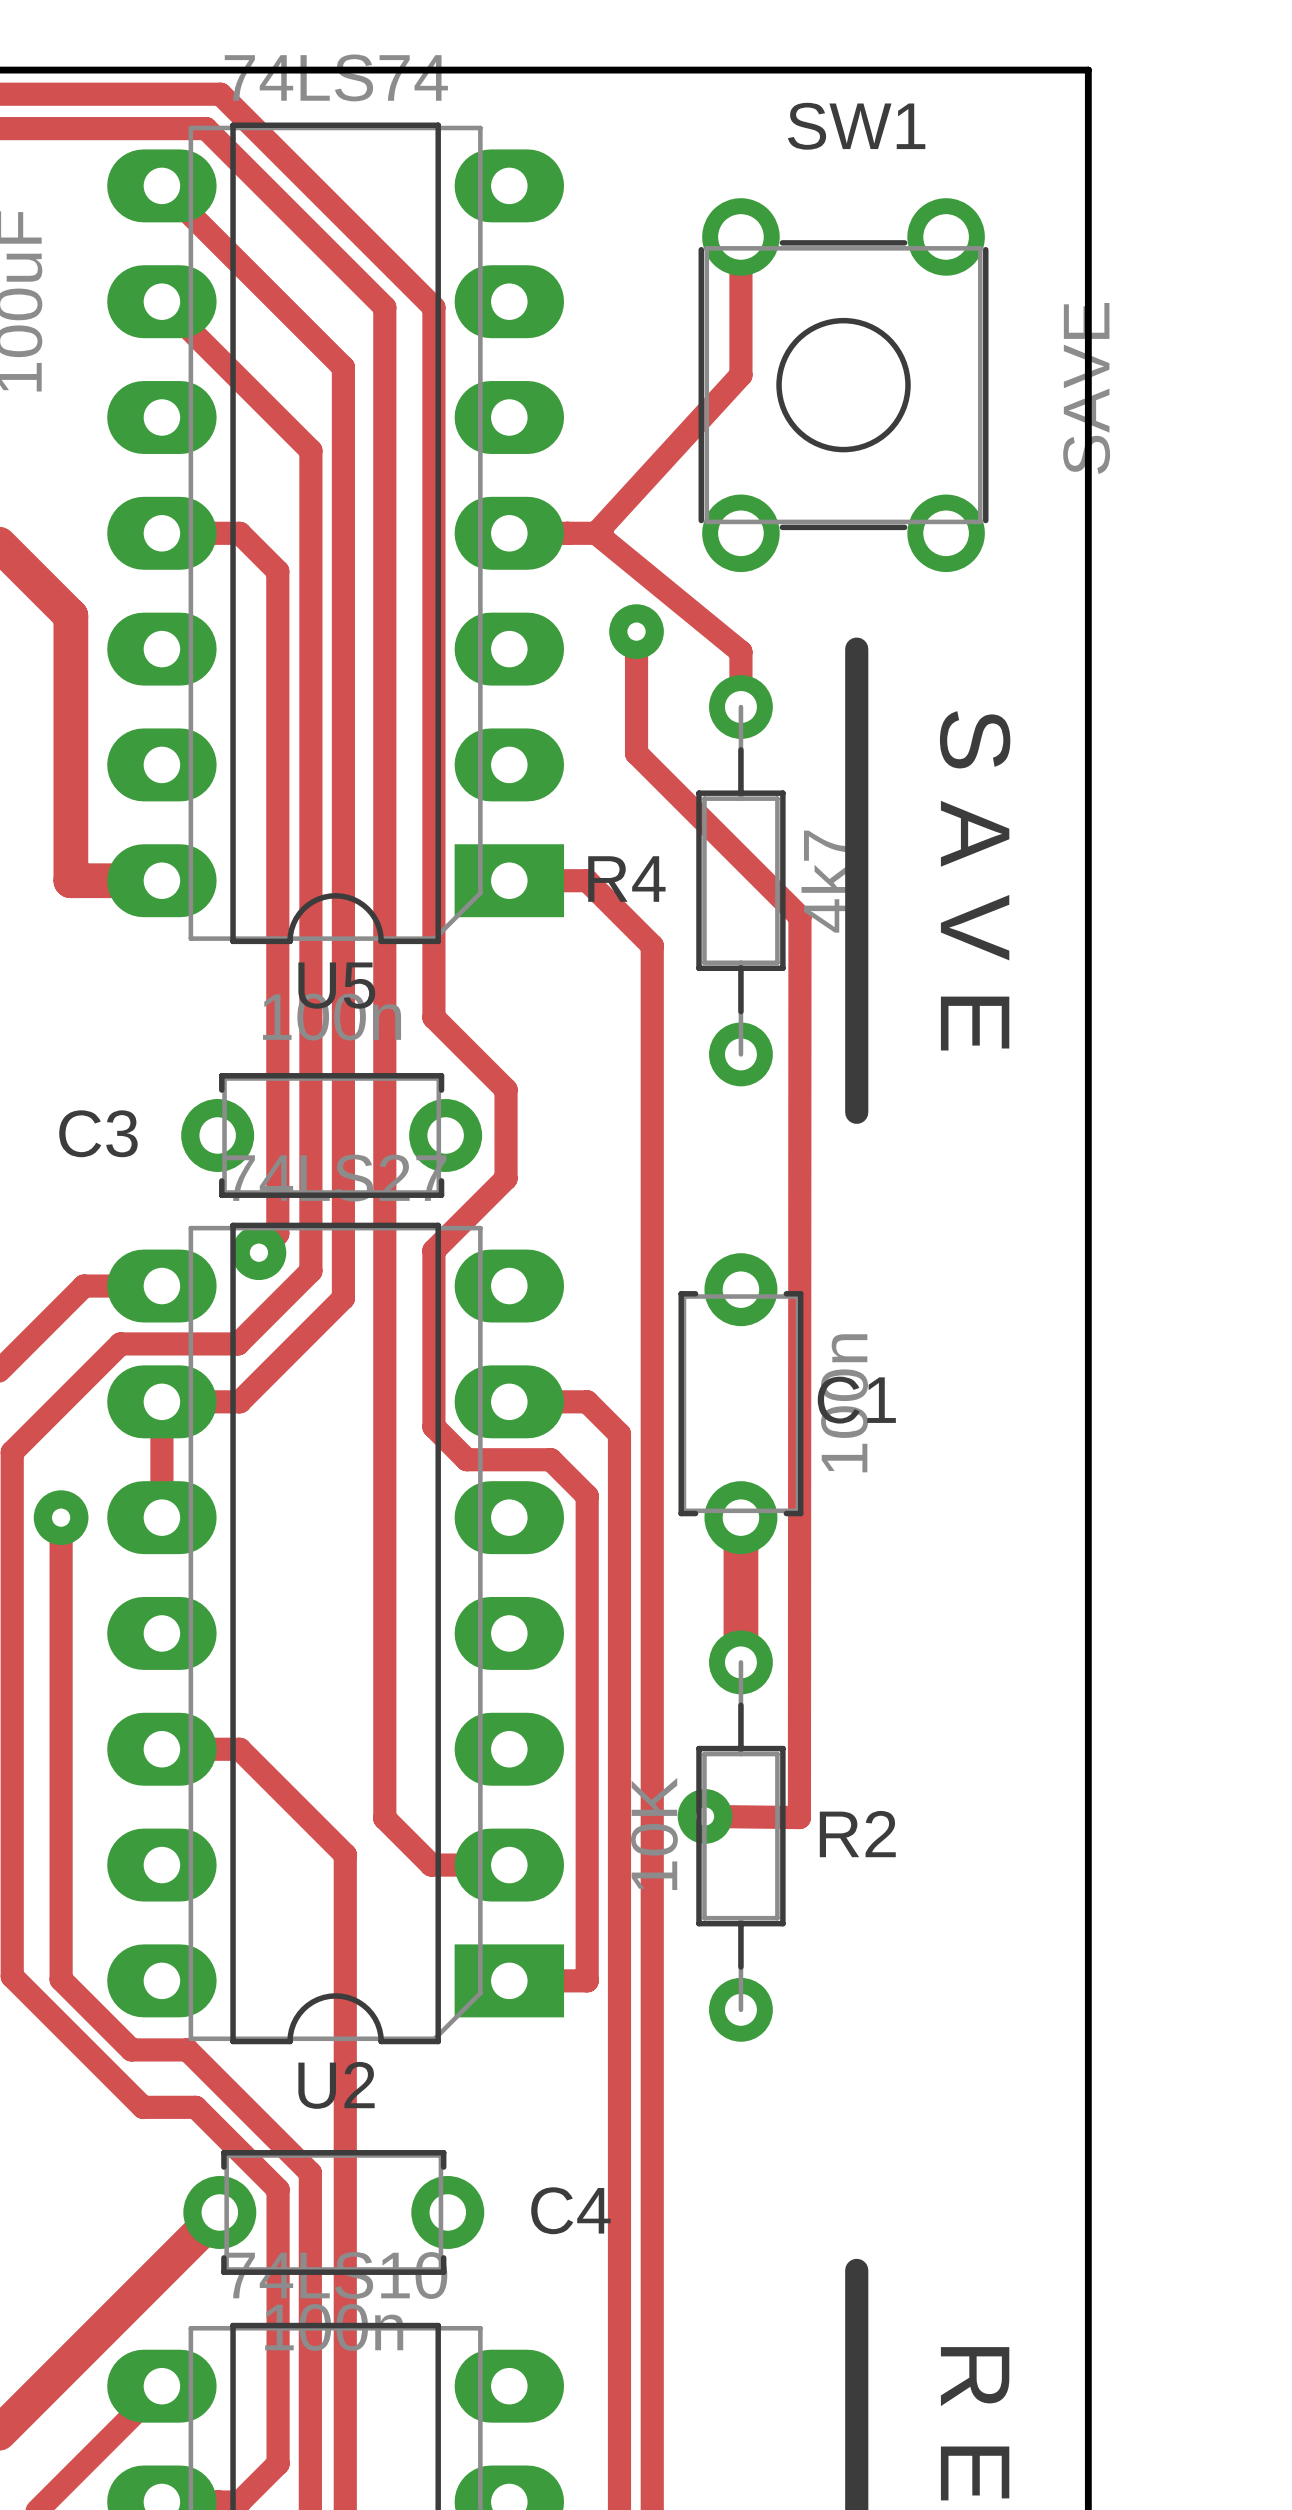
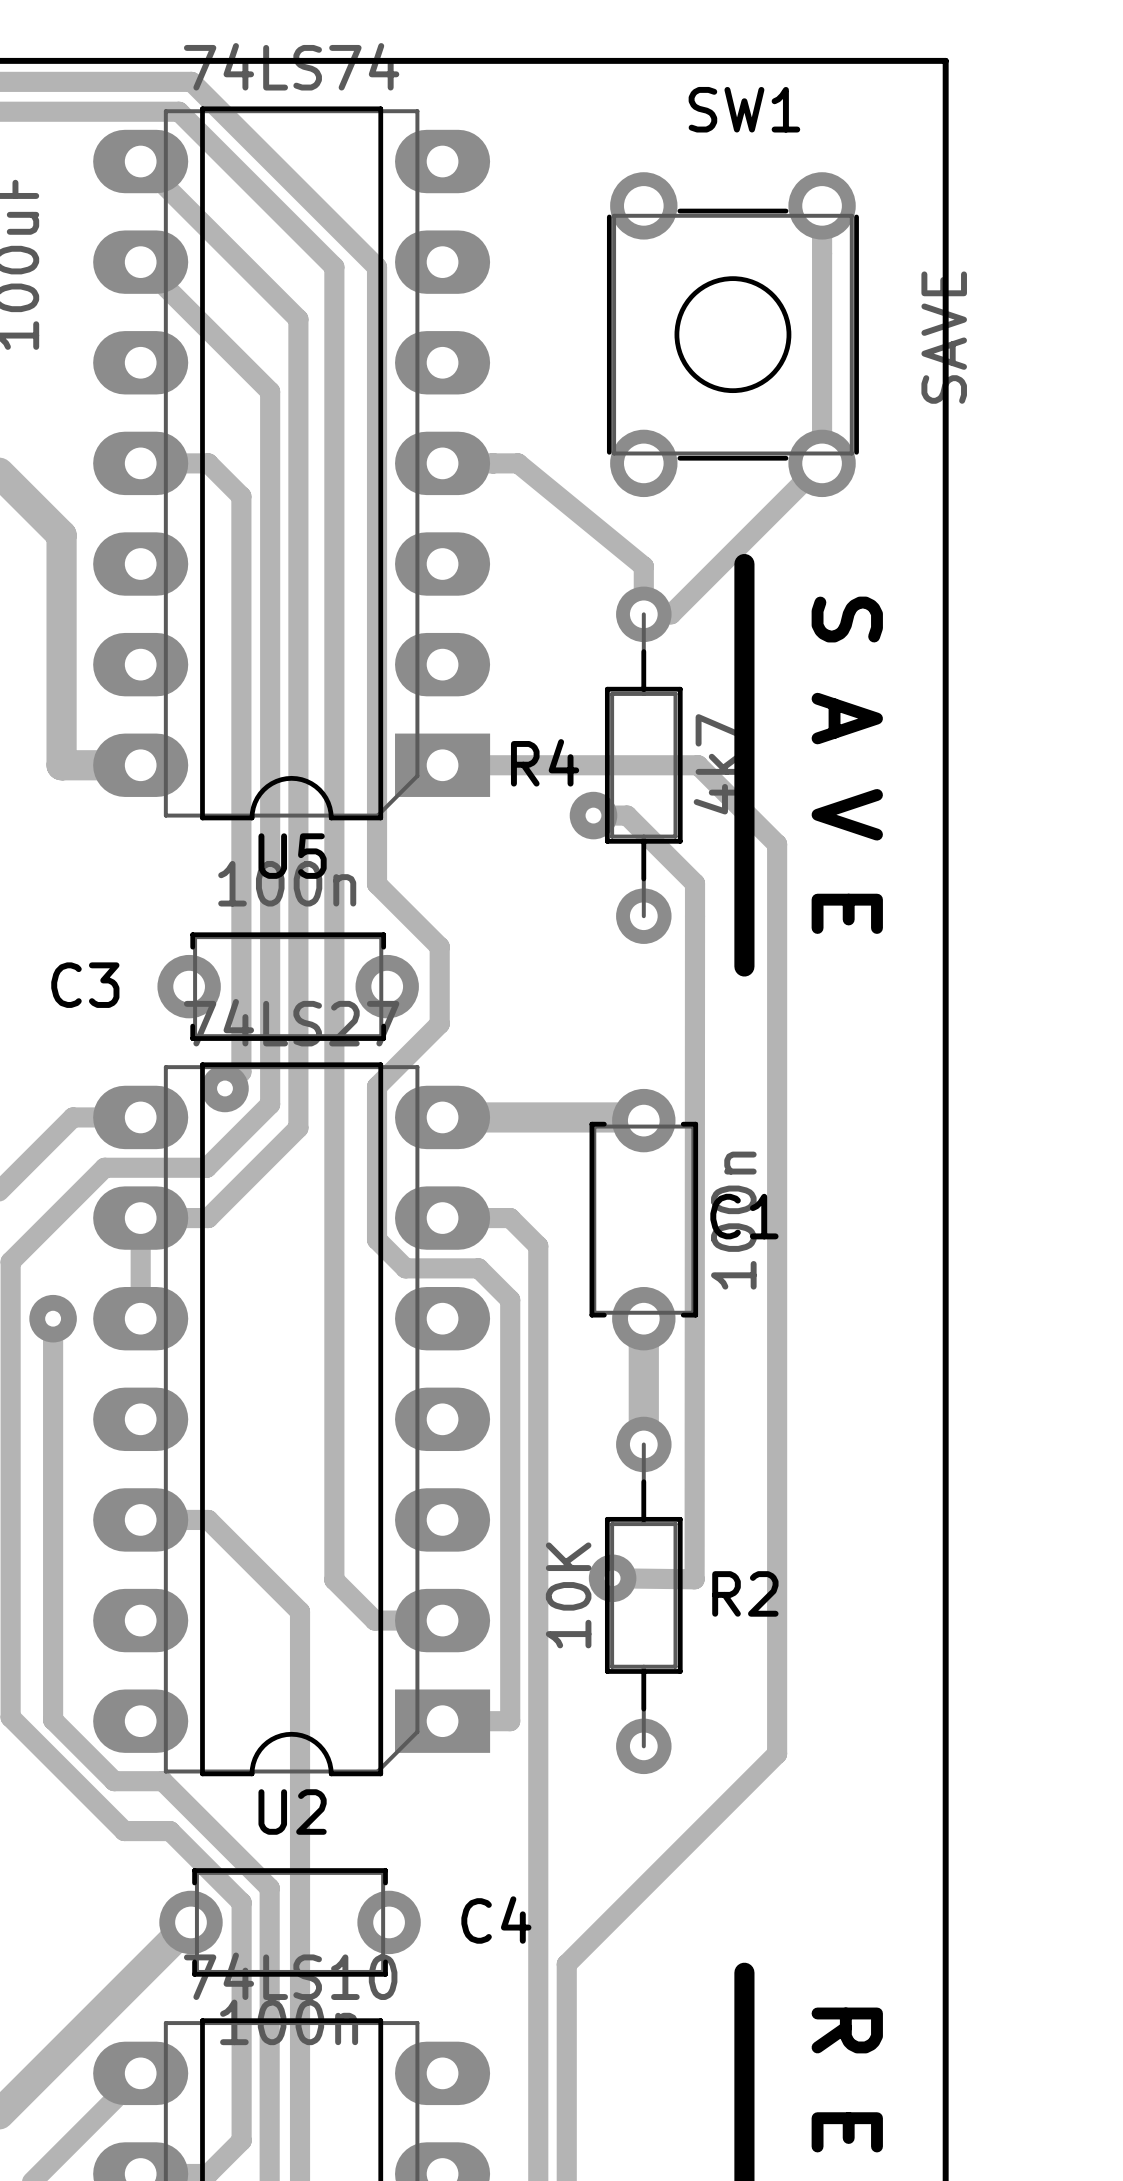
track: (740, 236) (740, 375) (596, 533) (602, 533) -> none
track: none -> (822, 205) (822, 463) (671, 614) (643, 614)
track: (636, 631) (636, 753) (799, 916) (799, 1054) -> (593, 815) (627, 815) (695, 883) (695, 916)
via: (636, 631) -> none
track: (587, 880) (652, 945) (652, 2260) -> (510, 765) (698, 765) (777, 844) (777, 1753) (566, 1964)
via: none -> (593, 815)
track: none -> (442, 1117) (640, 1117) (643, 1120)

